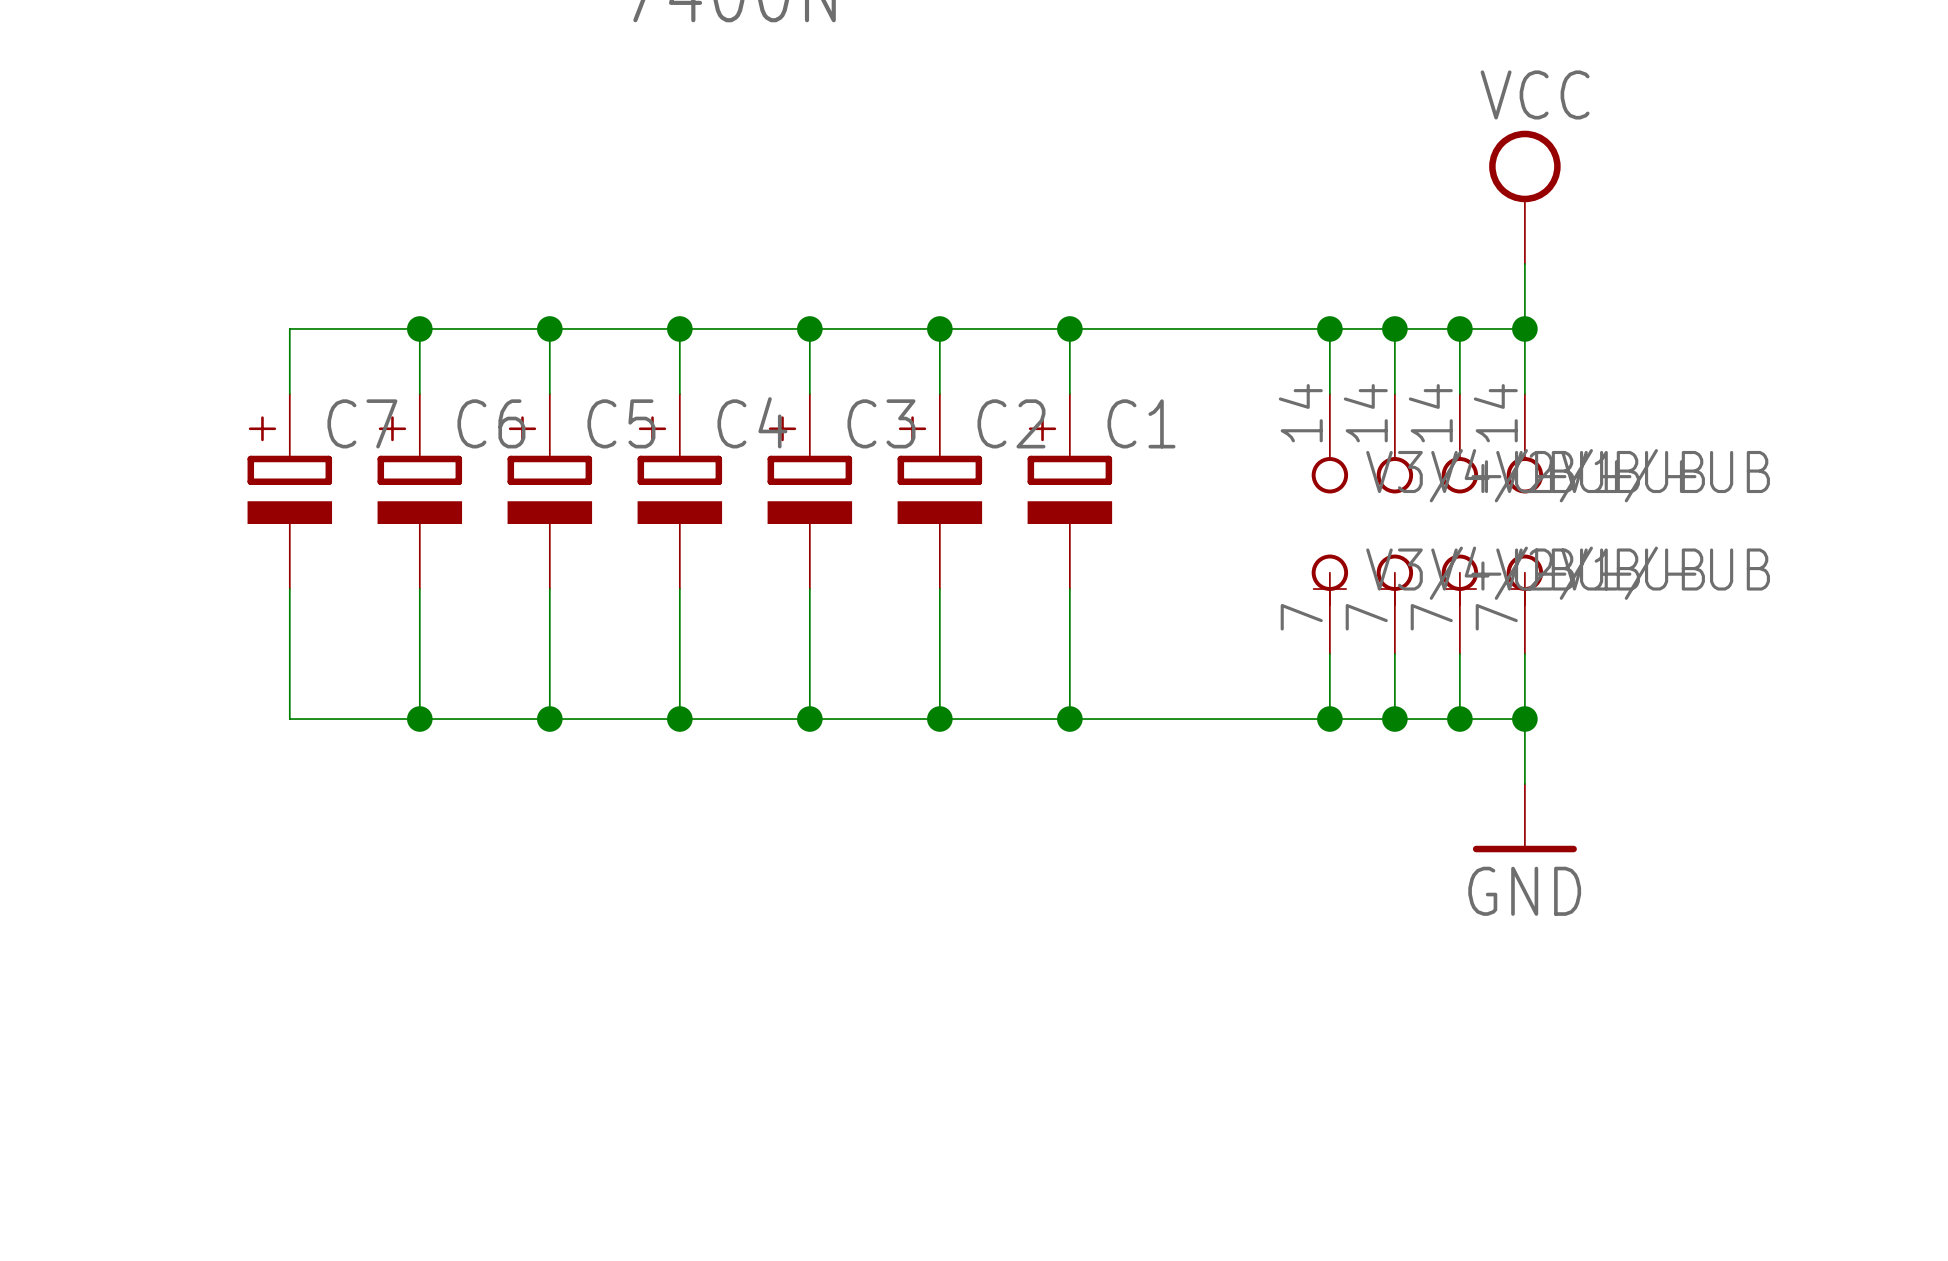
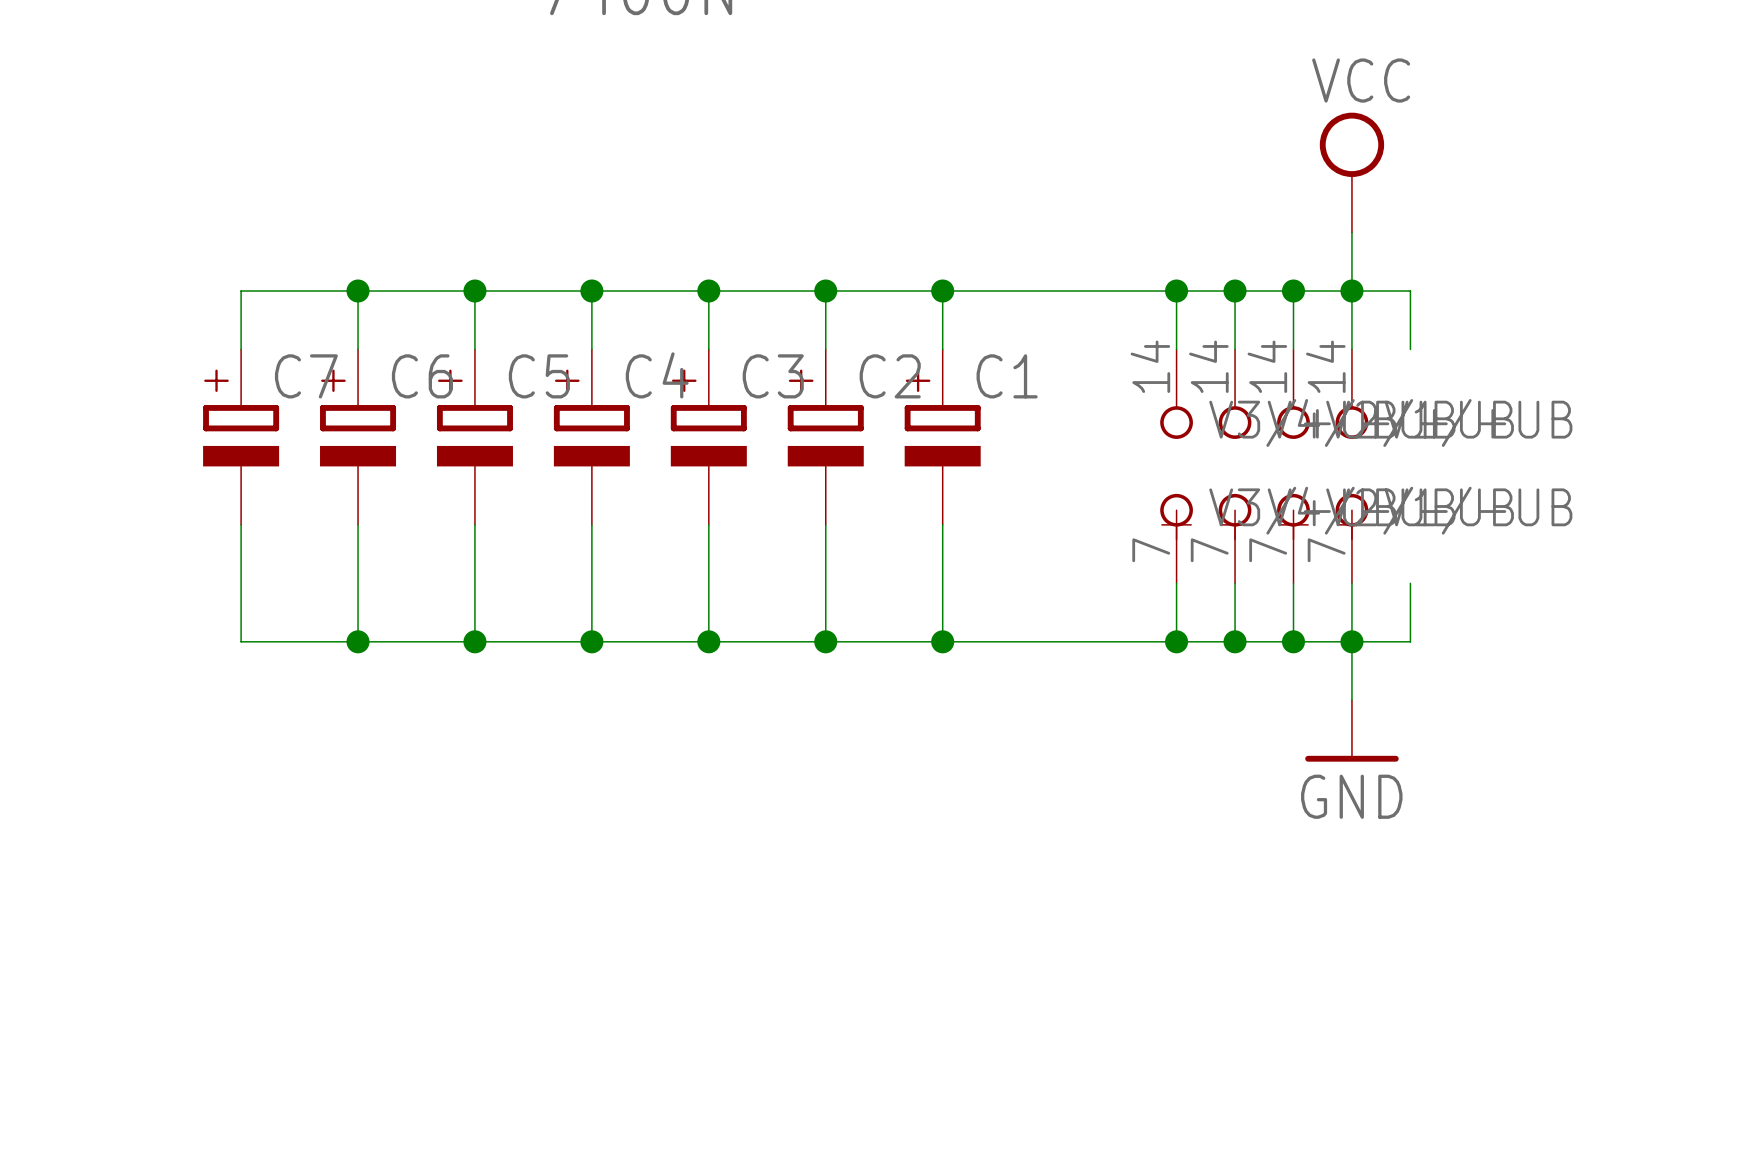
wire: none -> (1351, 291) (1410, 291) (1410, 349)
wire: none -> (1410, 583) (1410, 641) (1351, 641)

